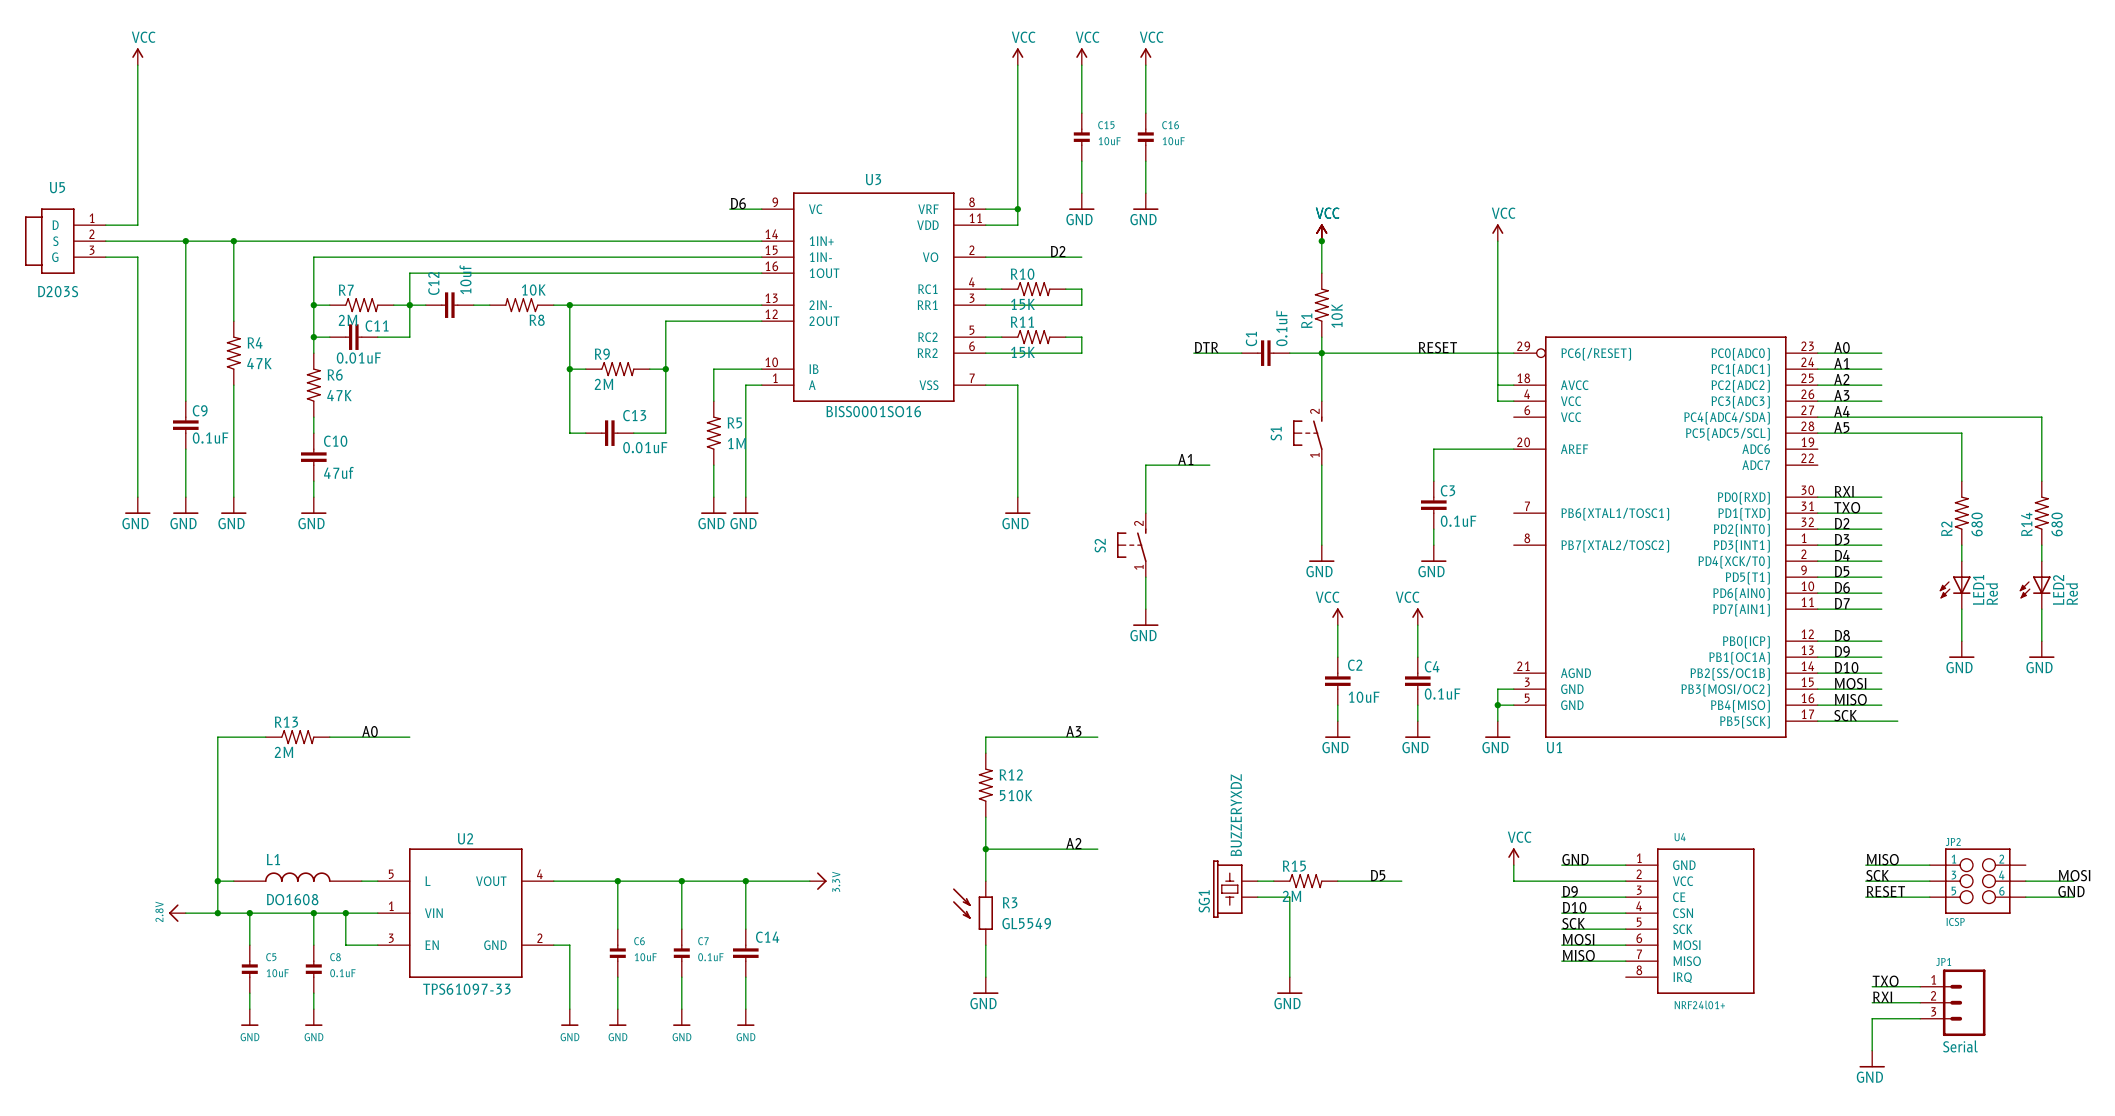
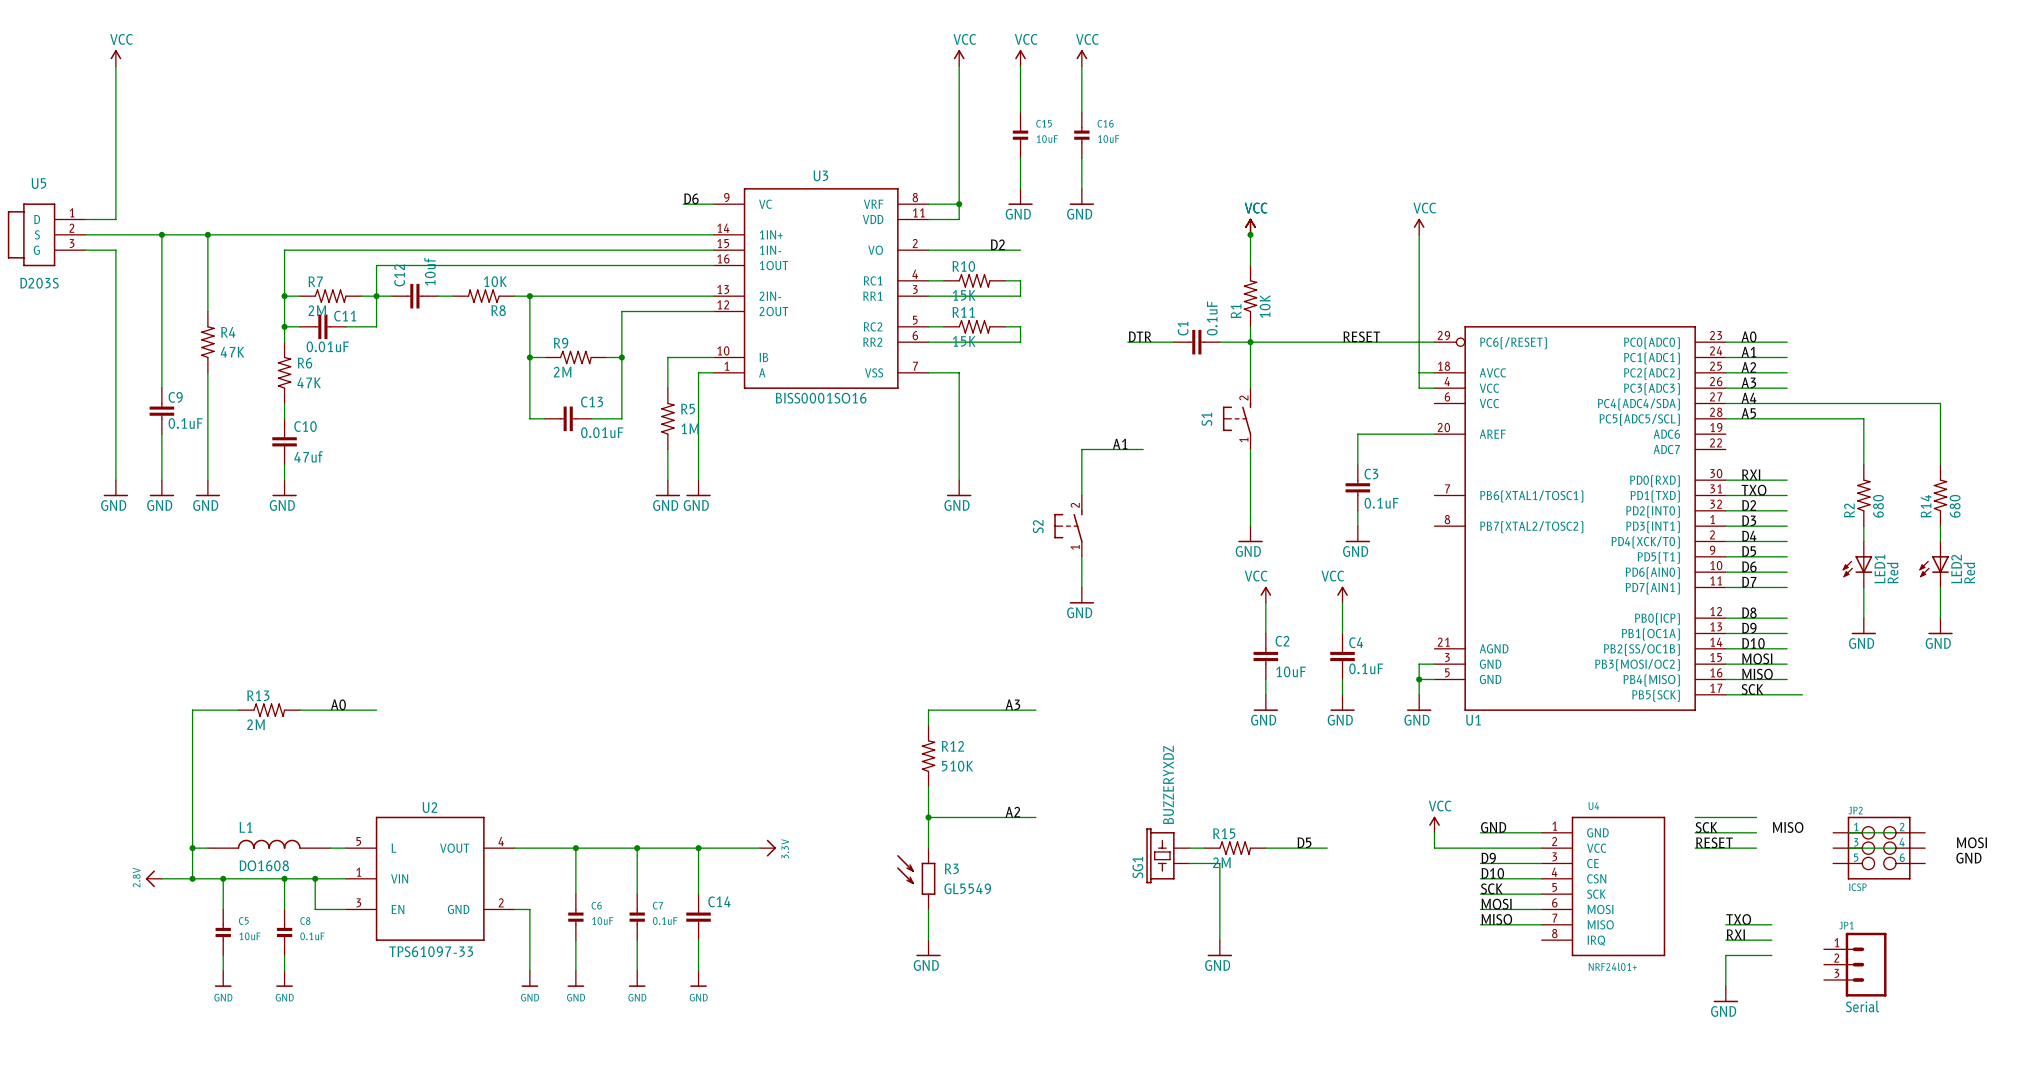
wire: (1865, 865) (1929, 865) -> (1695, 817) (1756, 817)
label position: SCK (1877, 875) -> SCK (1706, 827)
wire: (1865, 881) (1929, 881) -> (1695, 832) (1756, 832)
wire: (2025, 881) (2073, 881) -> (1848, 832) (1894, 832)
label position: RESET (1885, 891) -> RESET (1714, 842)
wire: (1865, 897) (1929, 897) -> (1695, 848) (1756, 848)
wire: (2025, 897) (2073, 897) -> (1848, 848) (1894, 848)
label position: TXO (1885, 981) -> TXO (1738, 919)
wire: (1872, 986) (1920, 986) -> (1725, 924) (1771, 924)
label position: RXI (1882, 997) -> RXI (1735, 934)
wire: (1872, 1002) (1920, 1002) -> (1725, 940) (1771, 940)
wire: (1920, 1018) (1872, 1018) (1872, 1050) -> (1771, 955) (1725, 955) (1725, 986)
power symbol position: GND (1872, 1059) -> GND (1725, 994)

